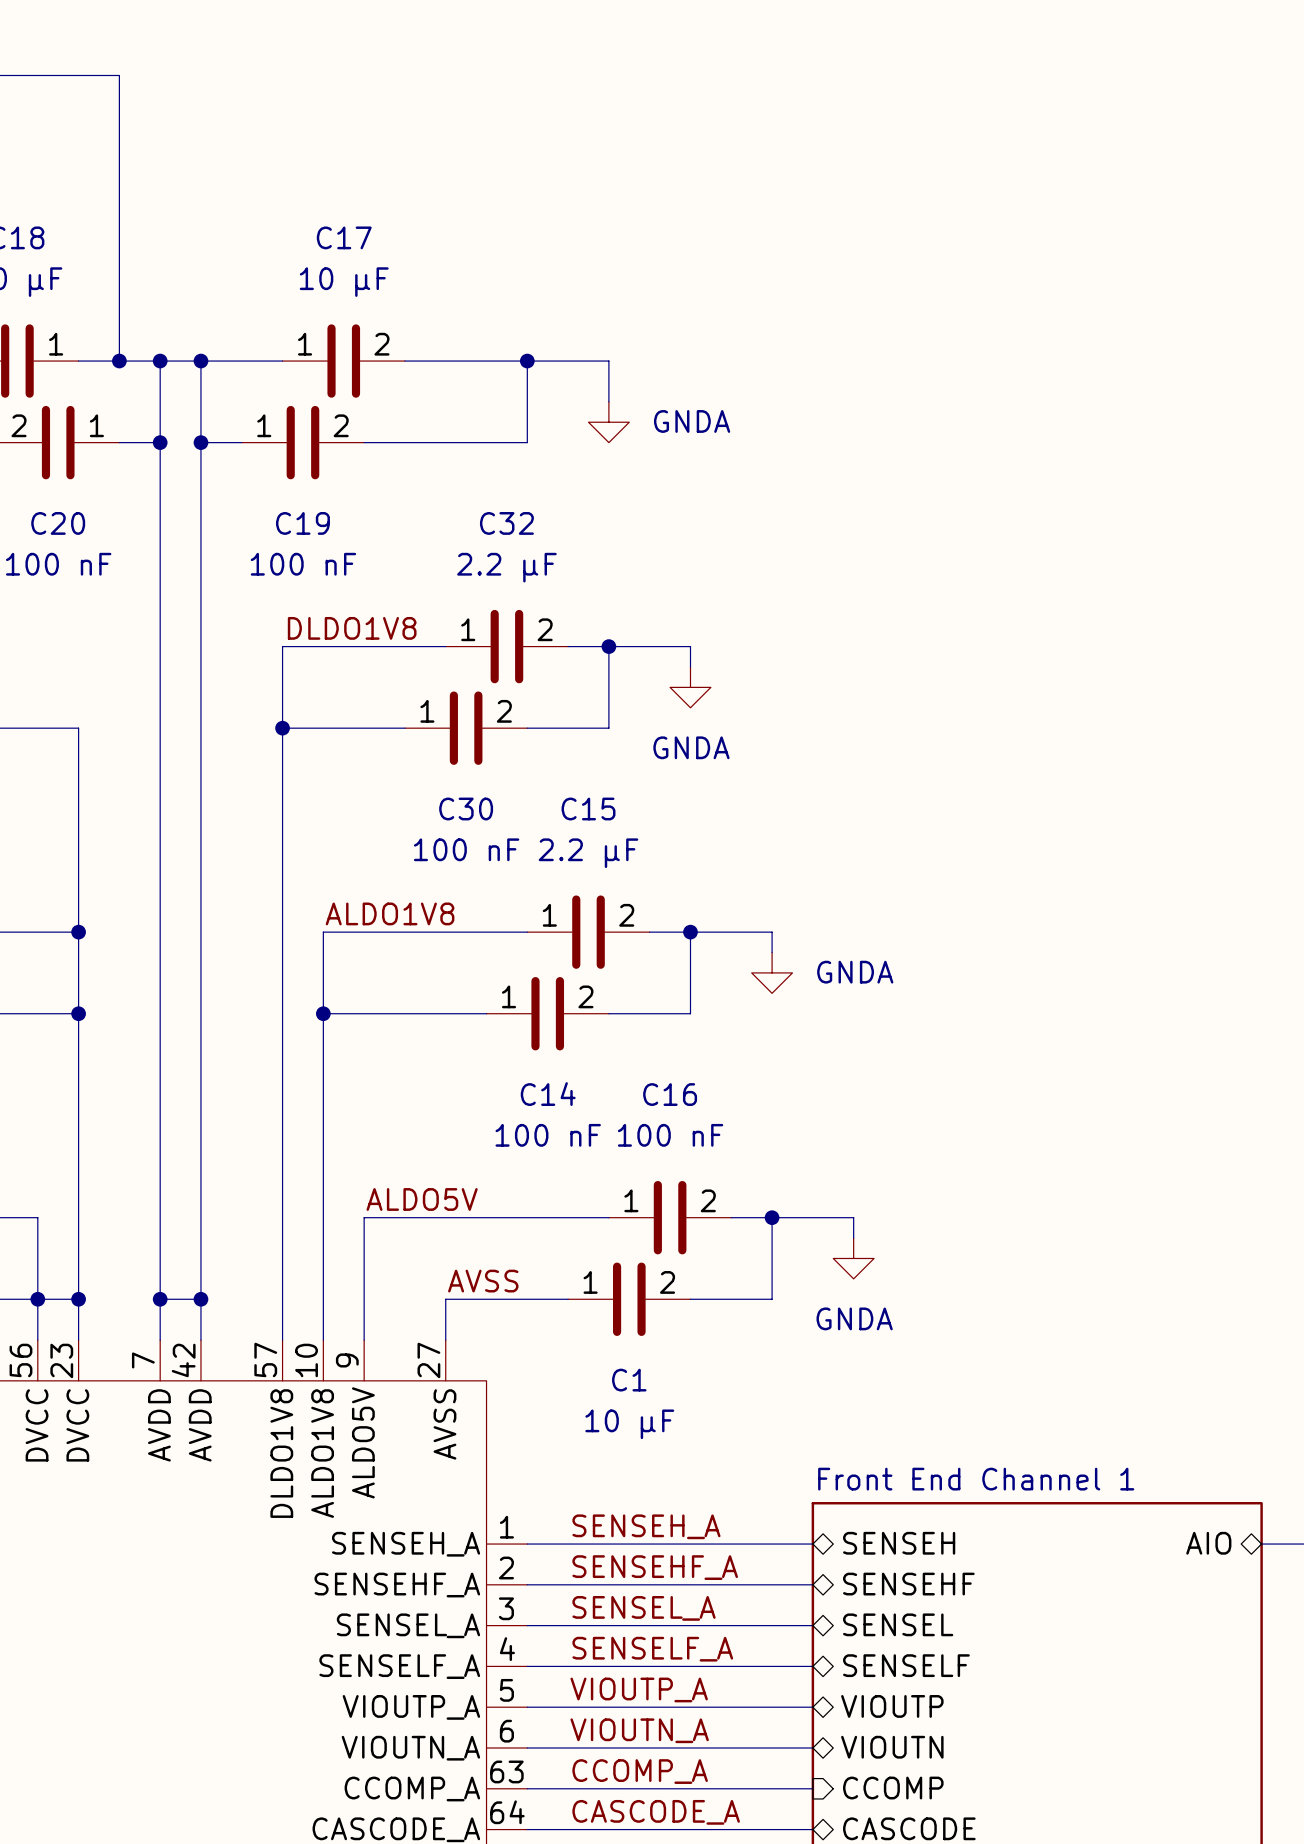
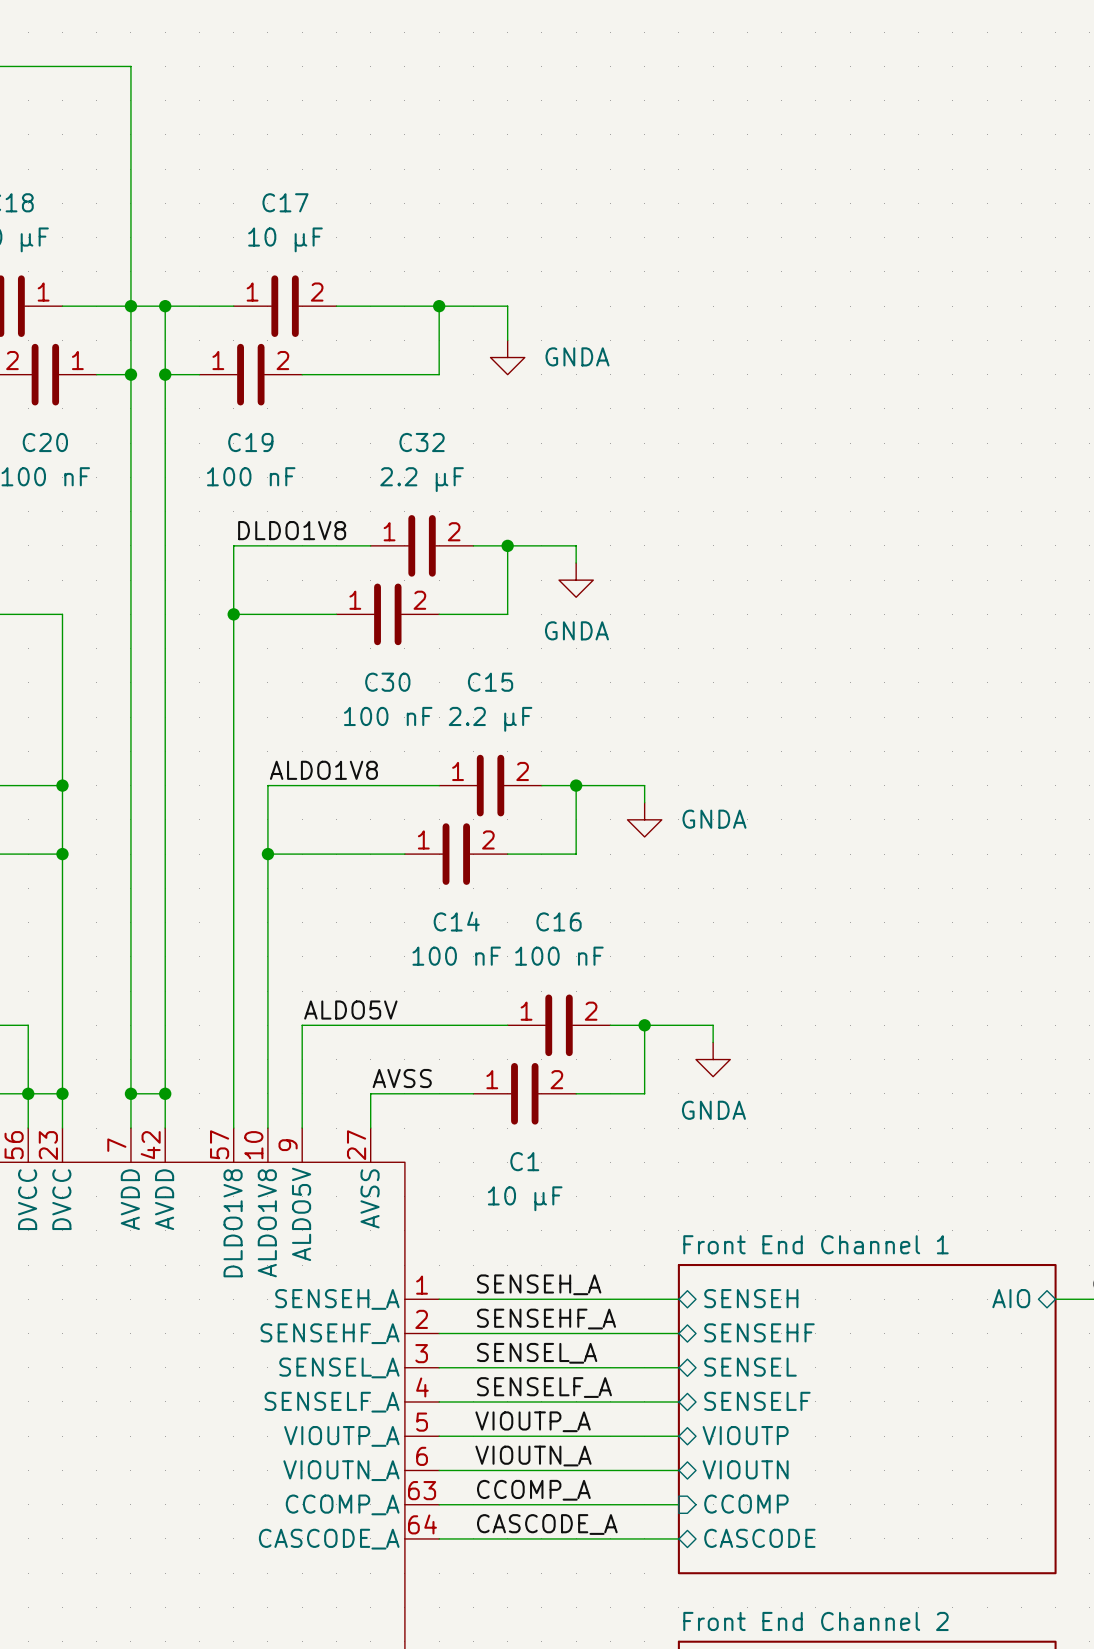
wire: (119, 75) (119, 361) -> (96, 66) (130, 66) (130, 306)
junction: (119, 361) -> none

